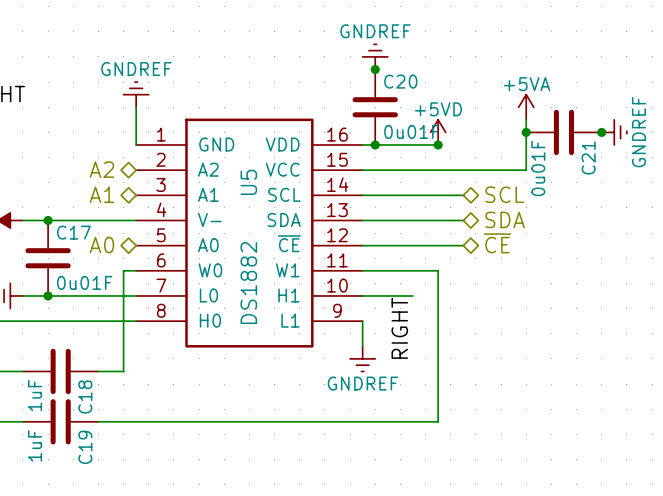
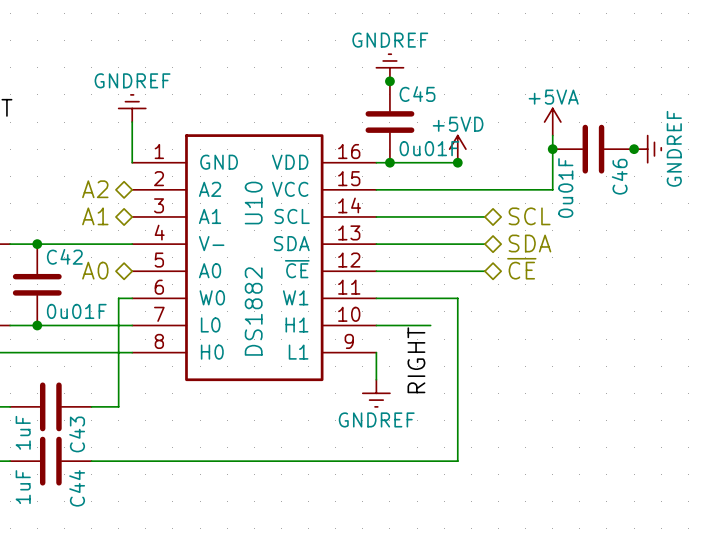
C20 name: C20 (400, 81) -> C45 (417, 94)
C21 name: C21 (588, 157) -> C46 (619, 176)
U5 name: U5 (248, 182) -> U10 (253, 203)
C17 name: C17 (73, 232) -> C42 (64, 256)
C18 name: C18 (85, 397) -> C43 (77, 434)
C19 name: C19 (85, 447) -> C44 (77, 488)

